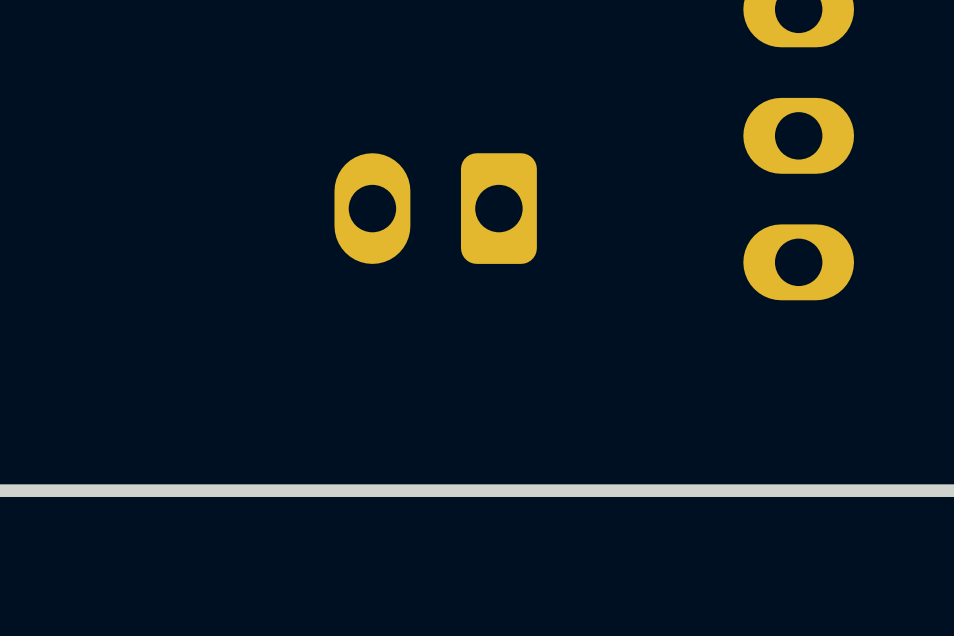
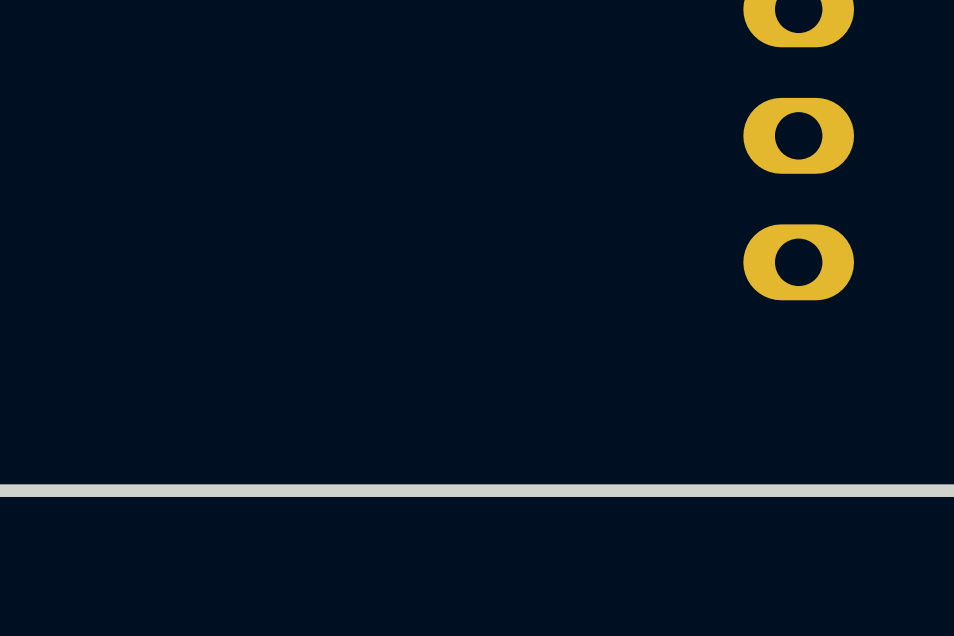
part: (435, 208) -> none

